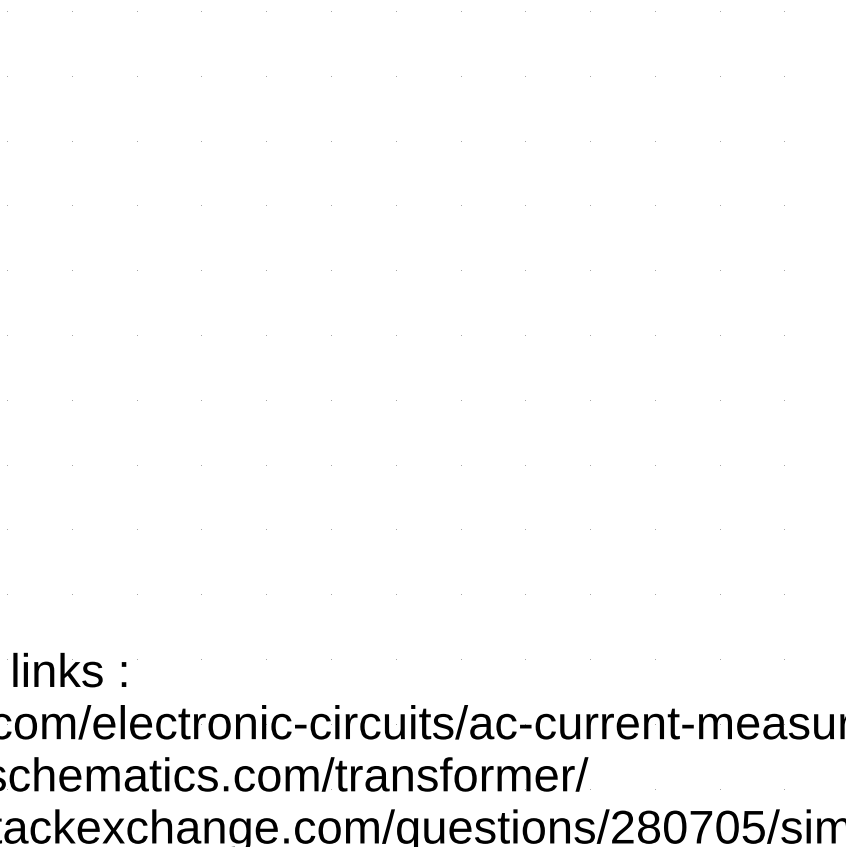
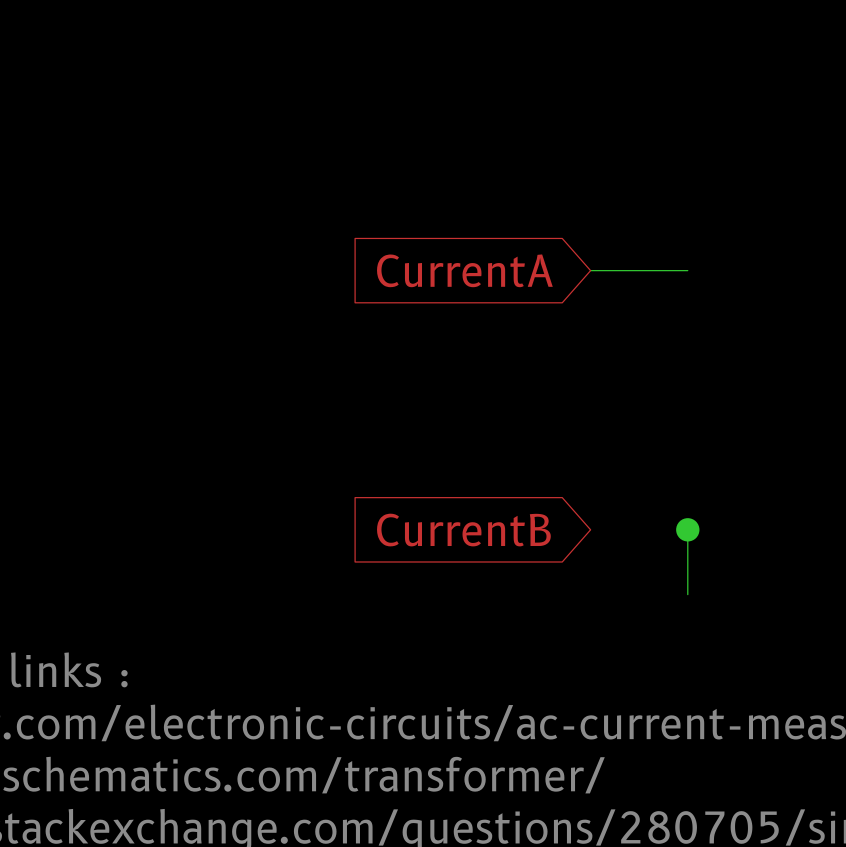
global label: none -> CurrentA (464, 270)
wire: none -> (590, 270) (687, 270)
global label: none -> CurrentB (463, 530)
wire: none -> (687, 529) (687, 594)
junction: none -> (687, 529)

